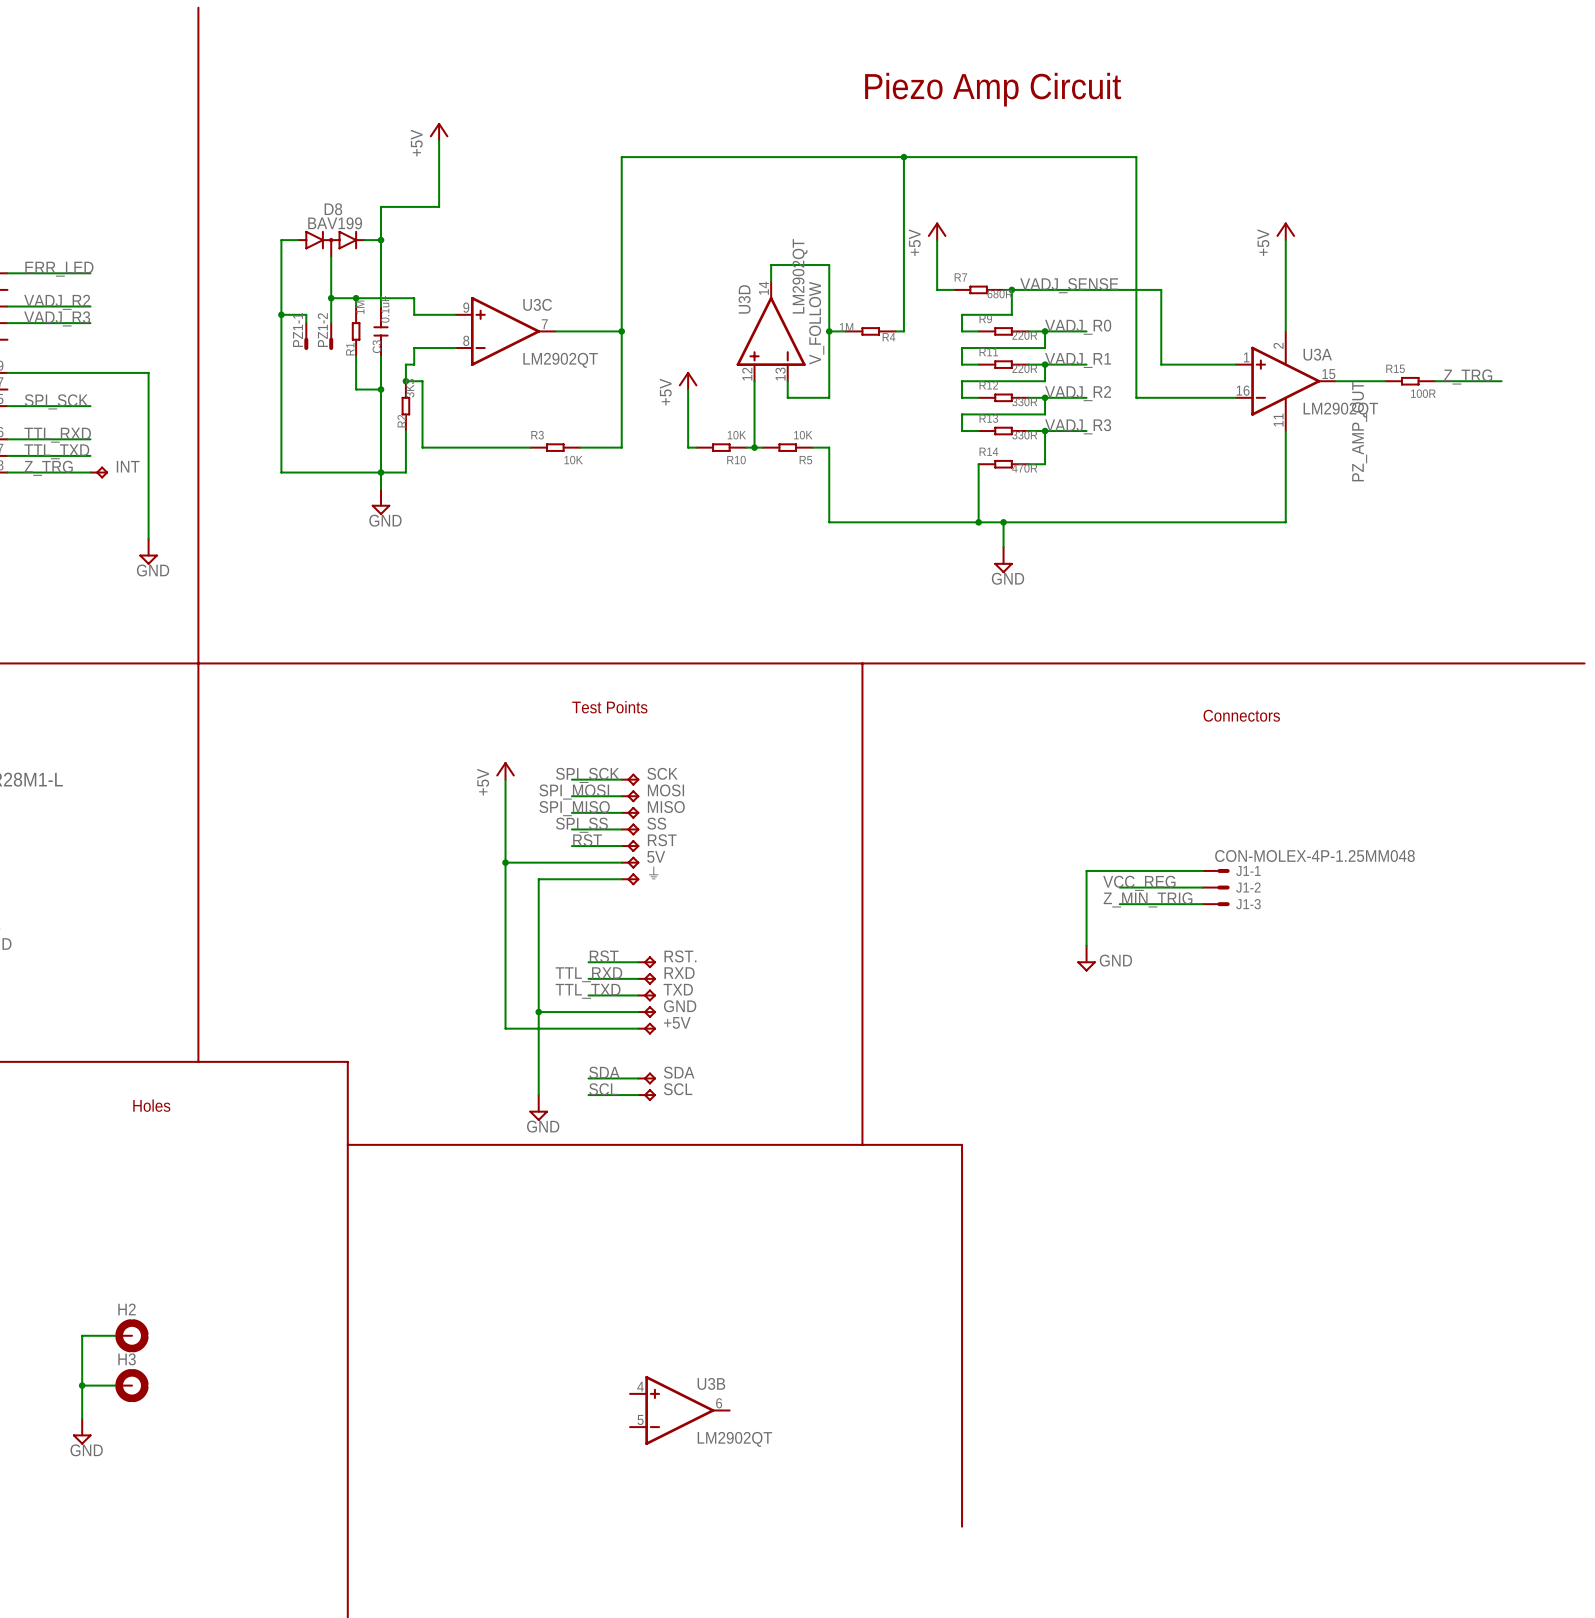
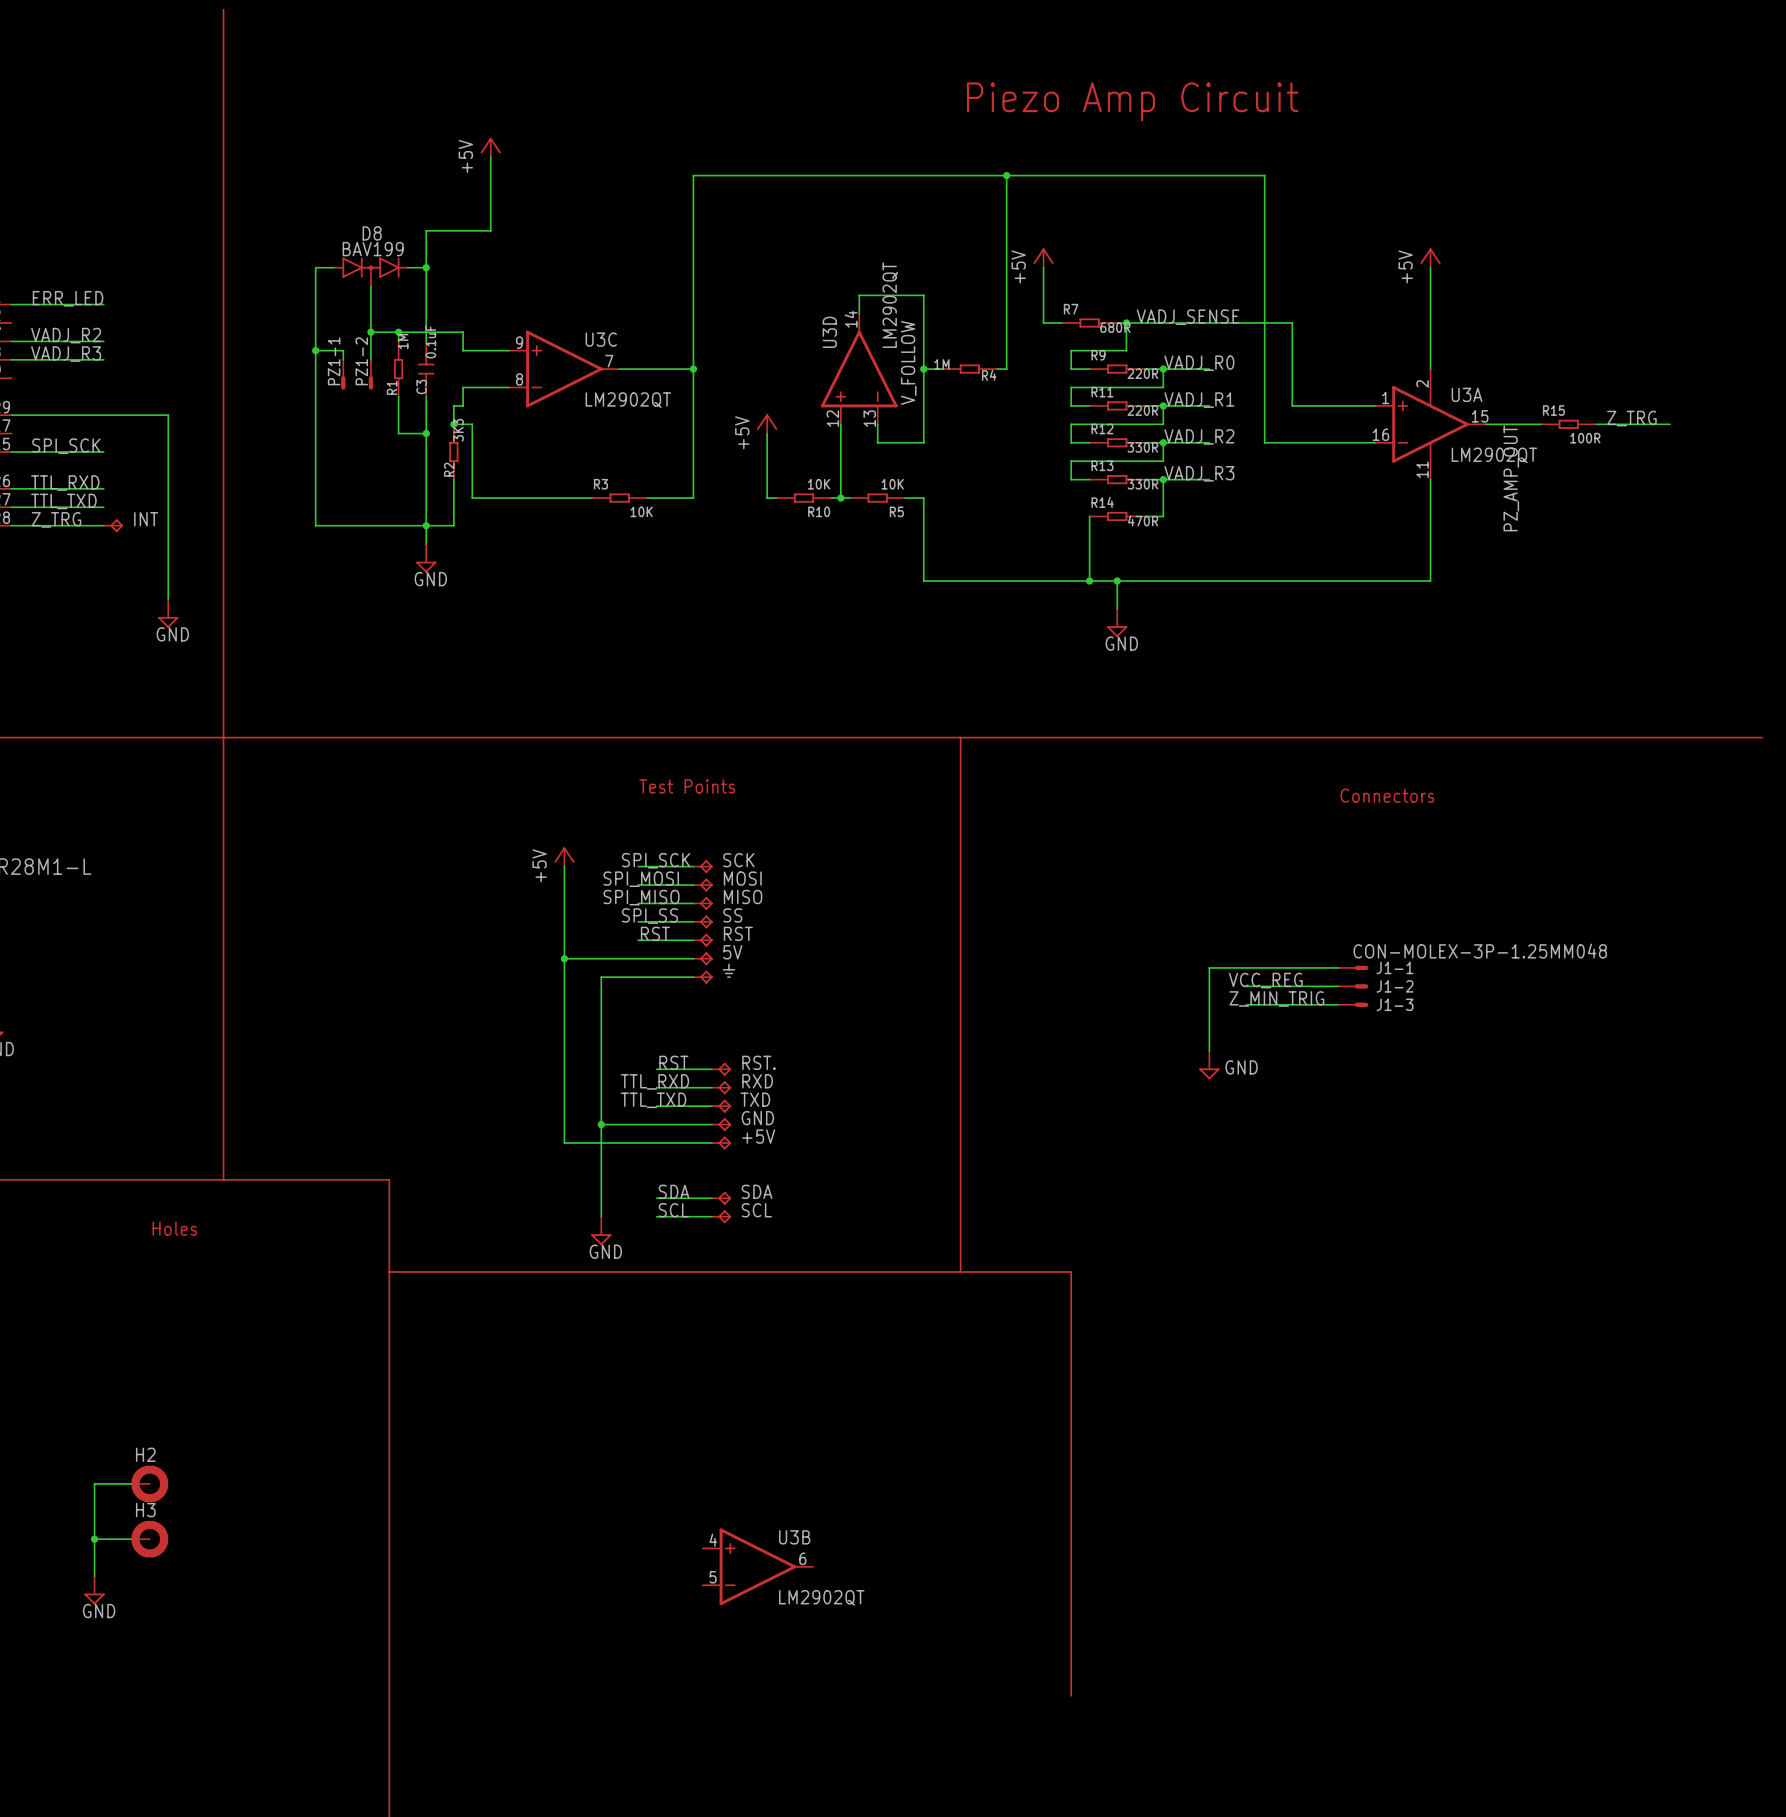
J1-1 value: CON-MOLEX-4P-1.25MM048 (1314, 856) -> CON-MOLEX-3P-1.25MM048 (1480, 951)

